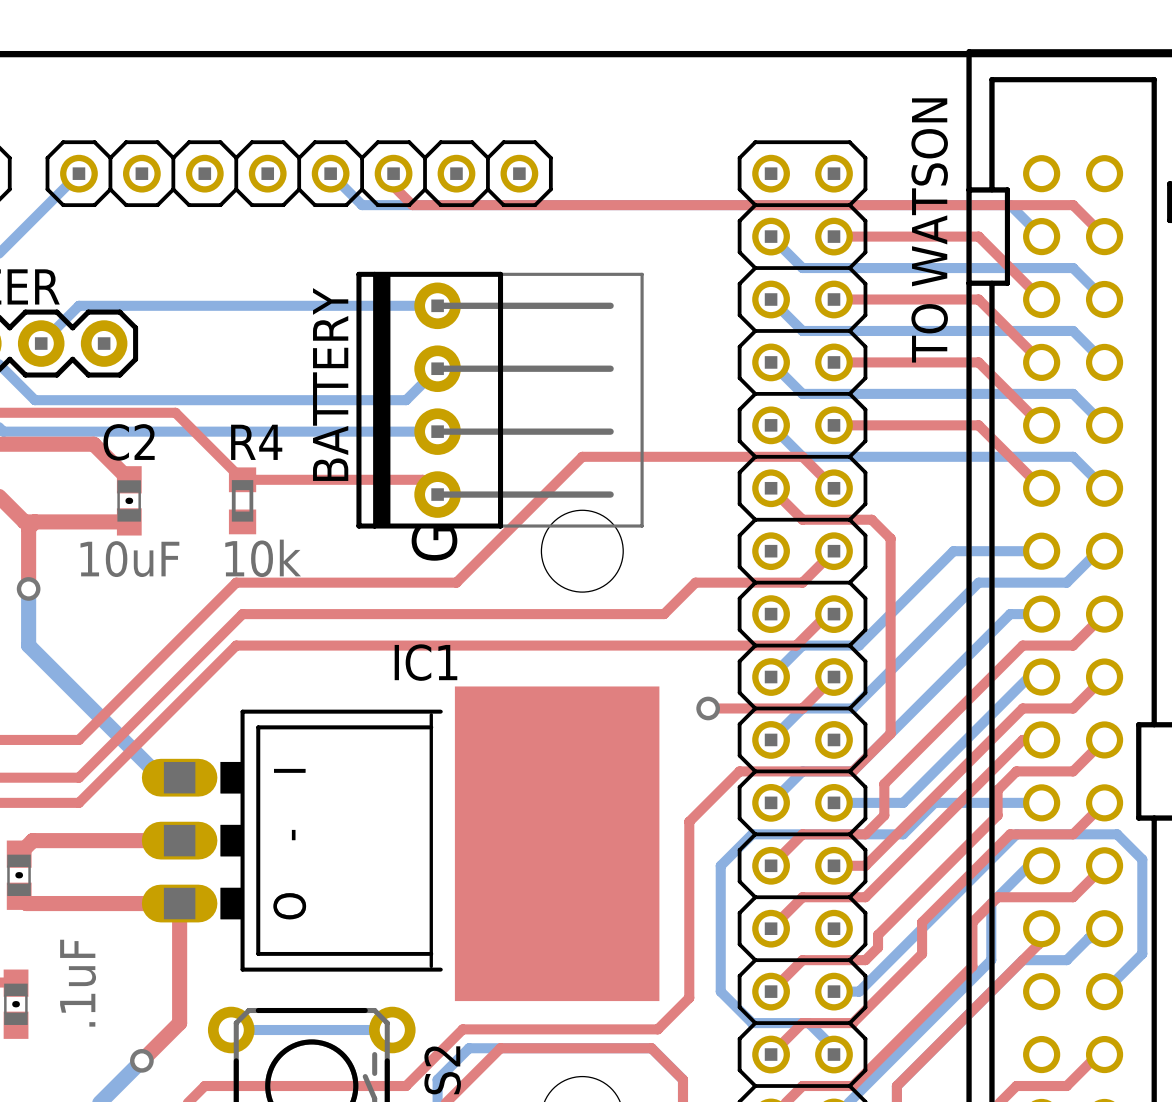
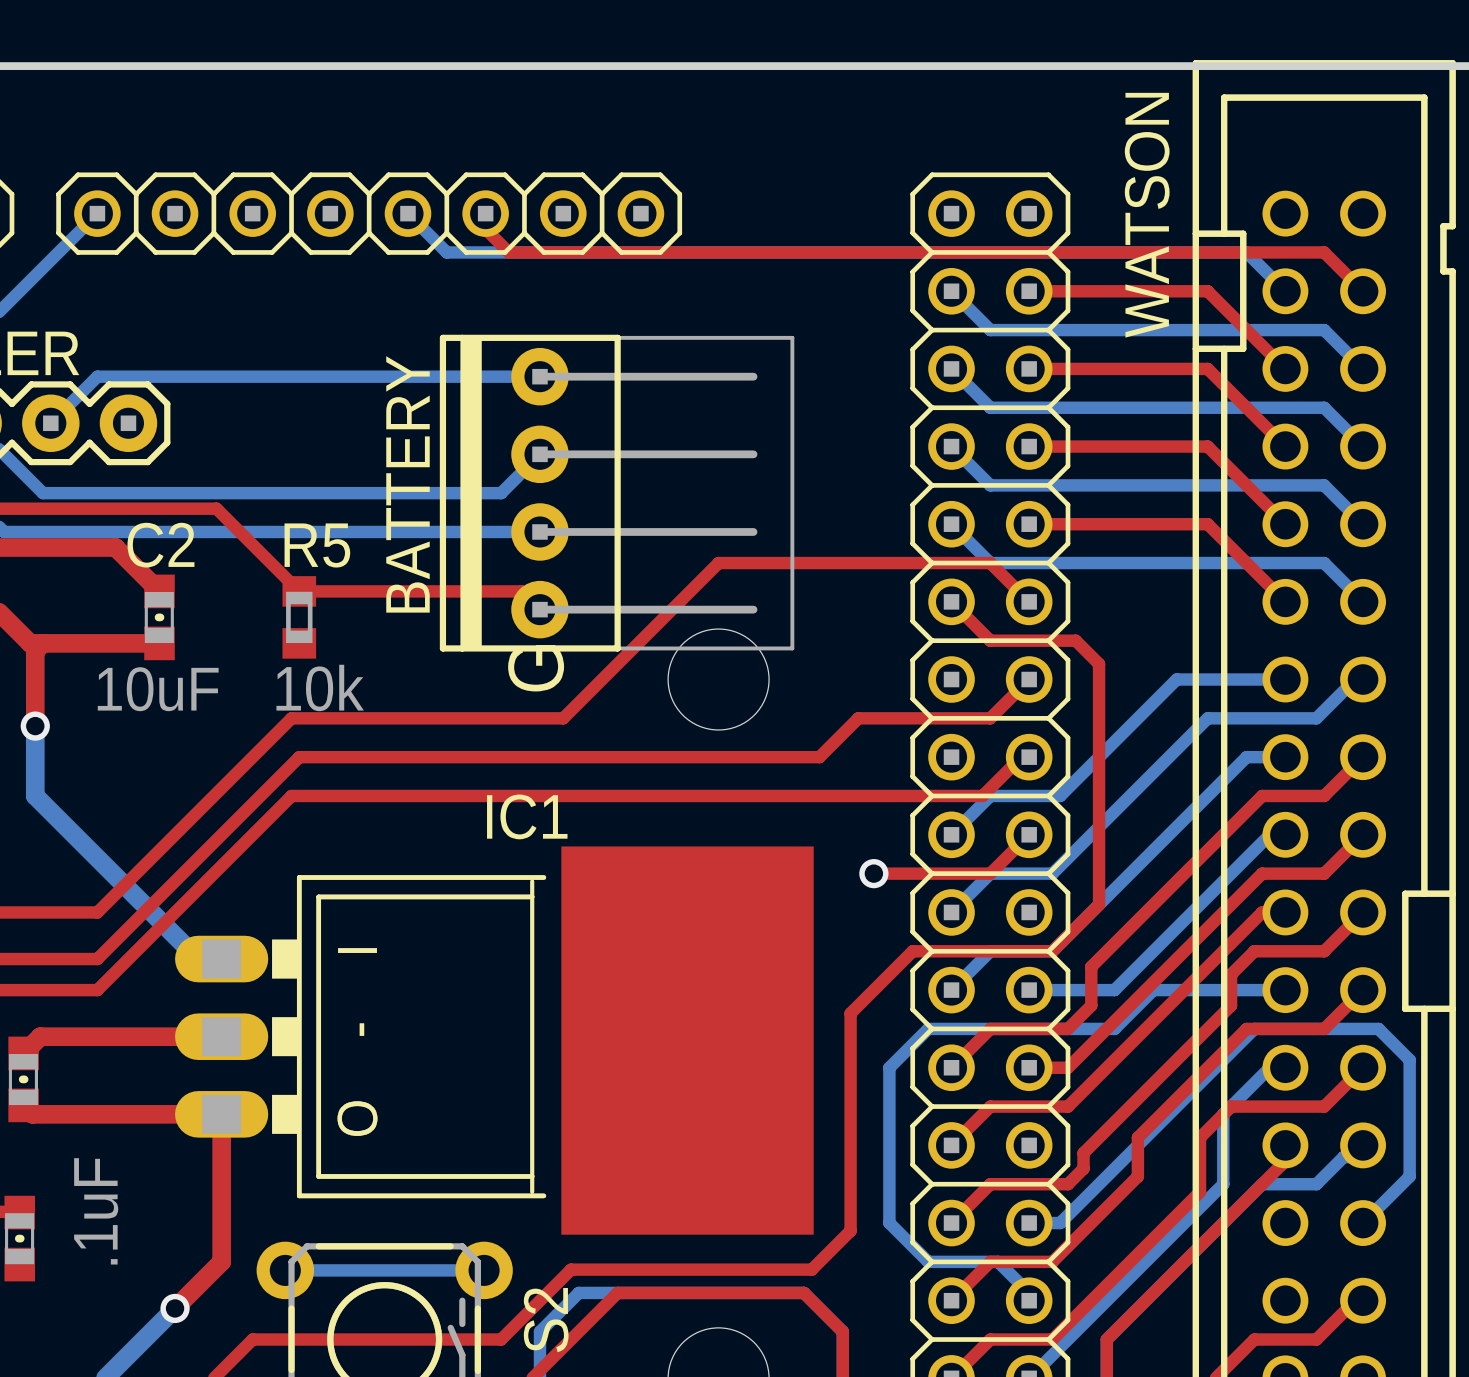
text: TO WATSON (929, 230) -> WATSON (1147, 215)
R4 name: R4 (256, 442) -> R5 (317, 545)

